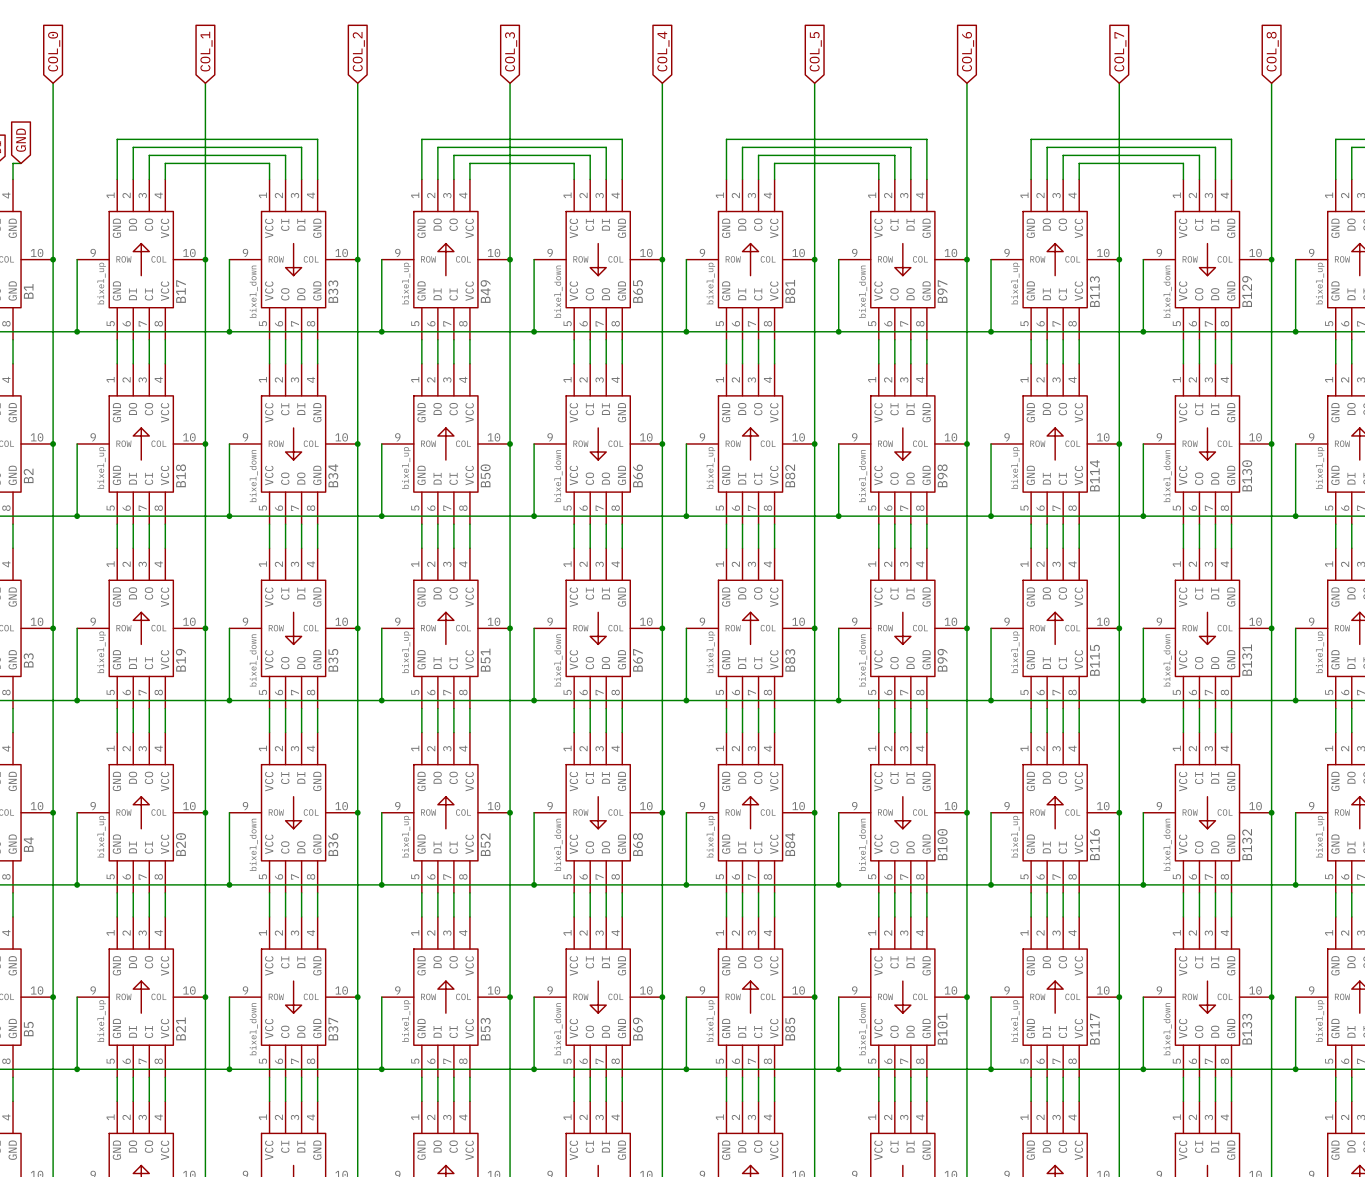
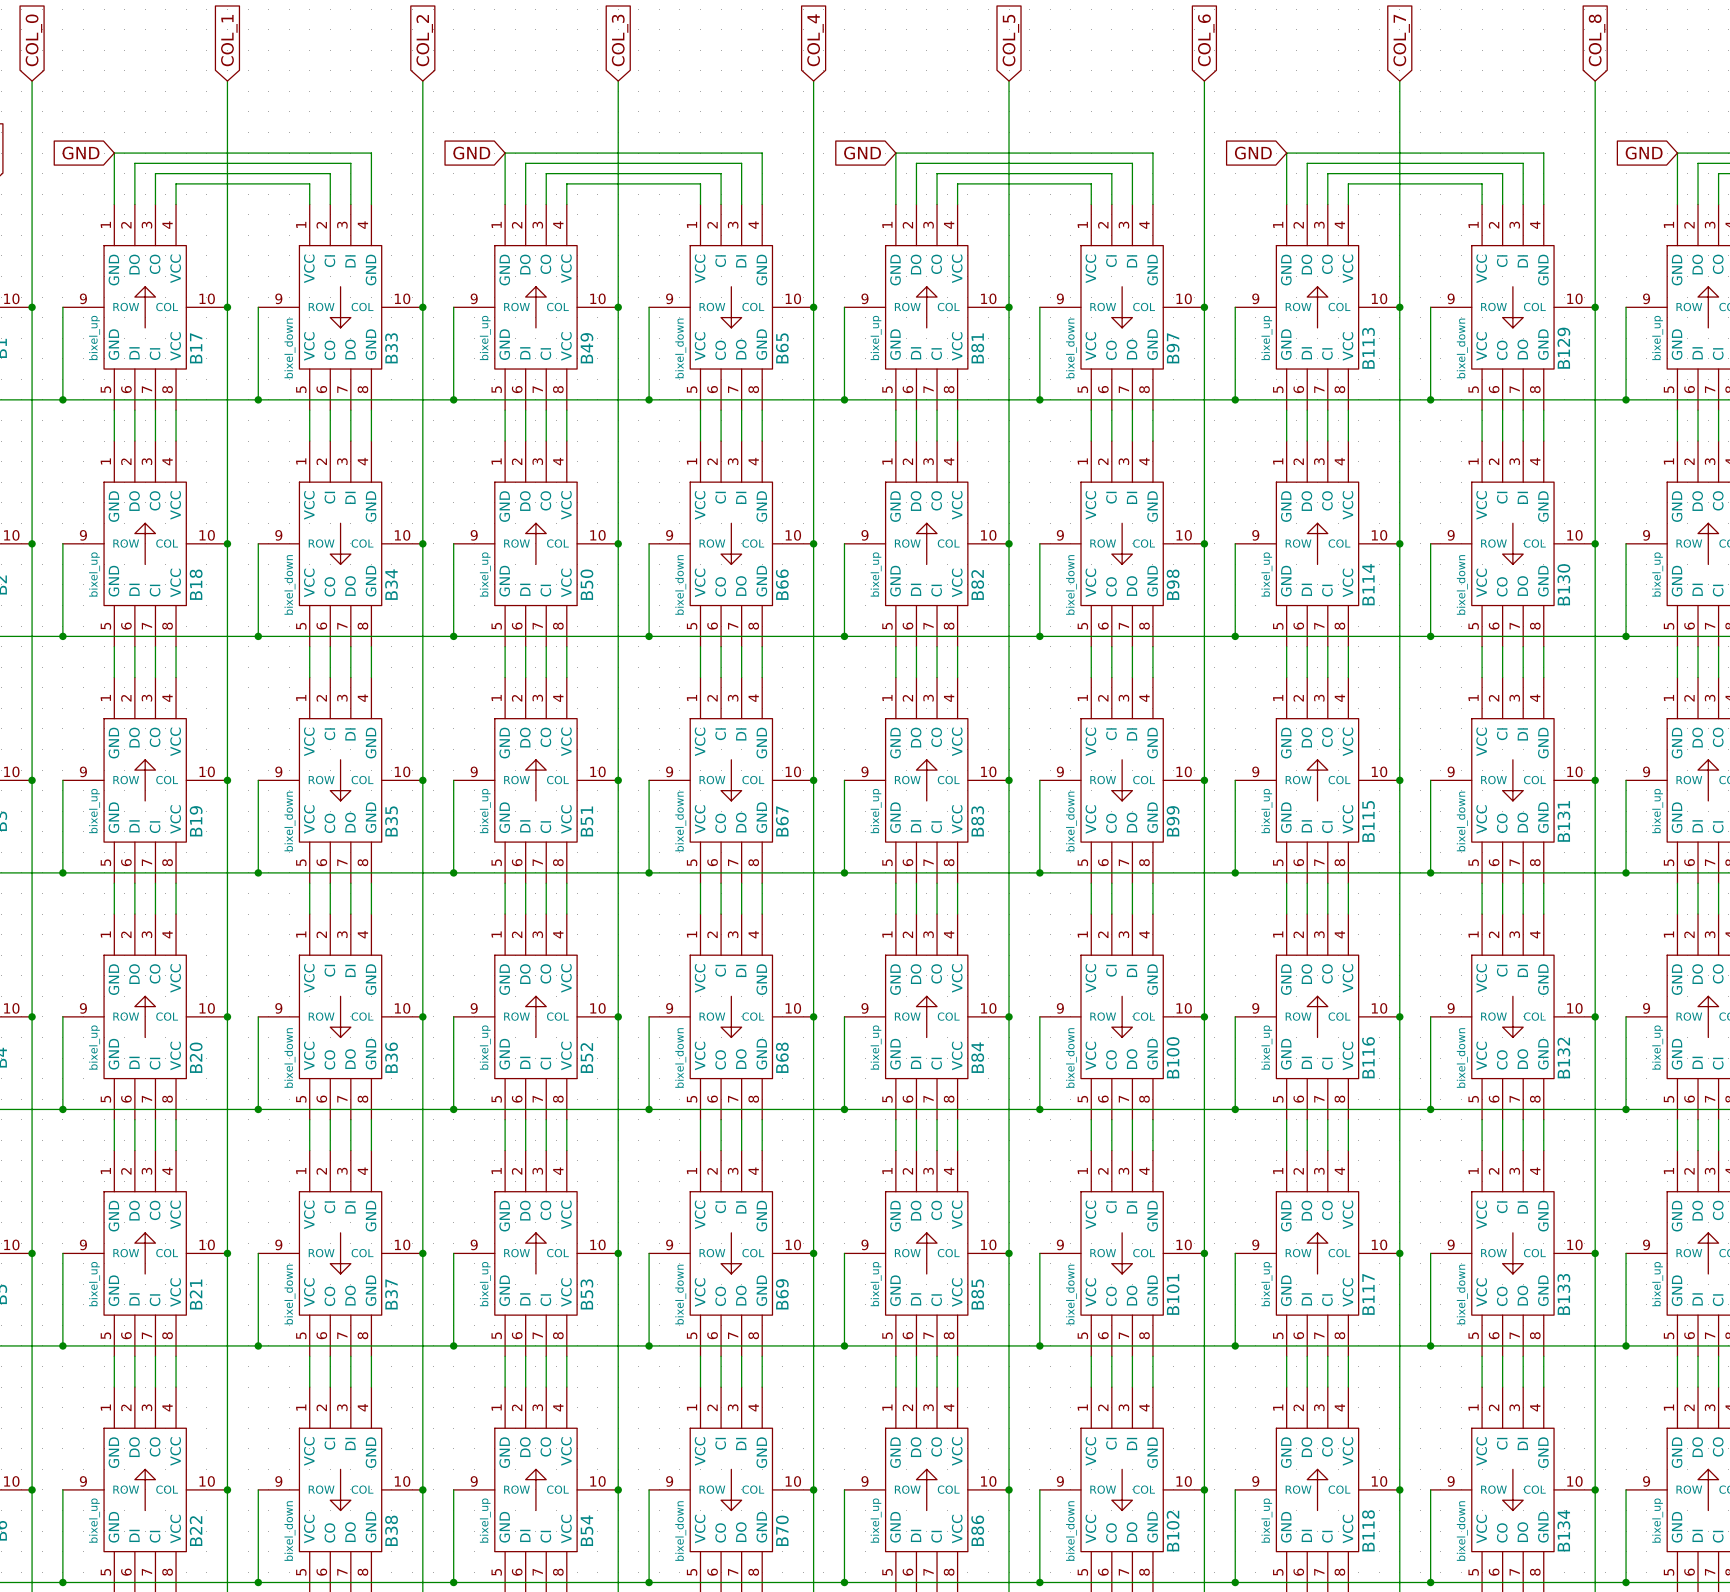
global label: none -> GND (81, 153)
global label: none -> GND (471, 153)
global label: none -> GND (862, 153)
global label: none -> GND (1253, 153)
global label: none -> GND (1644, 153)

